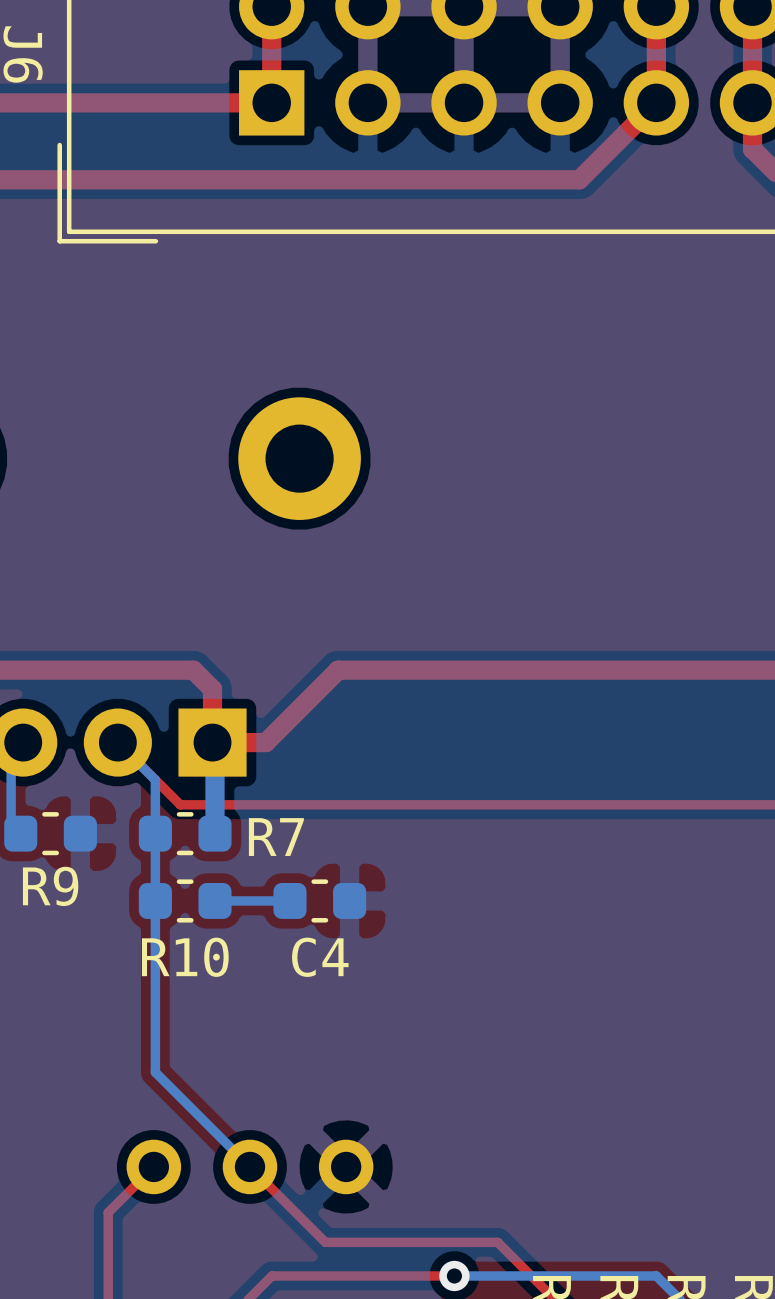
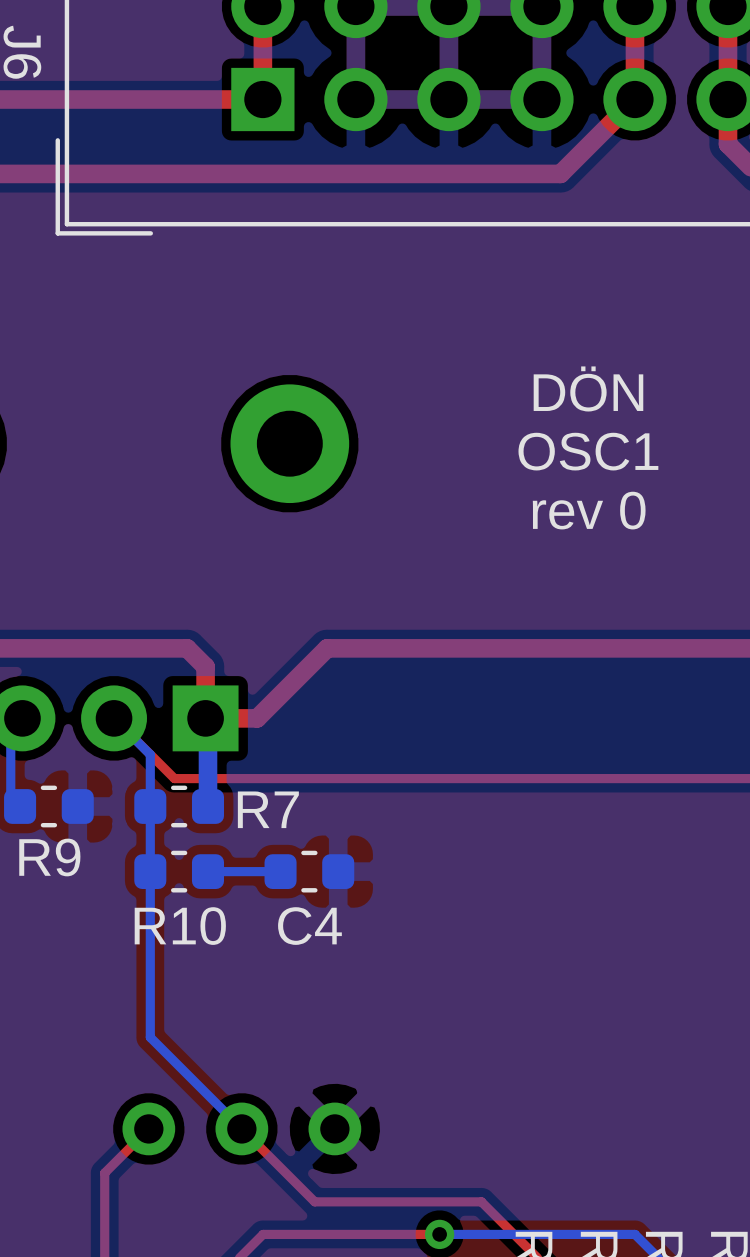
text: none -> DÖN (588, 388)
text: none -> OSC1 (588, 451)
text: none -> rev 0 (589, 510)

